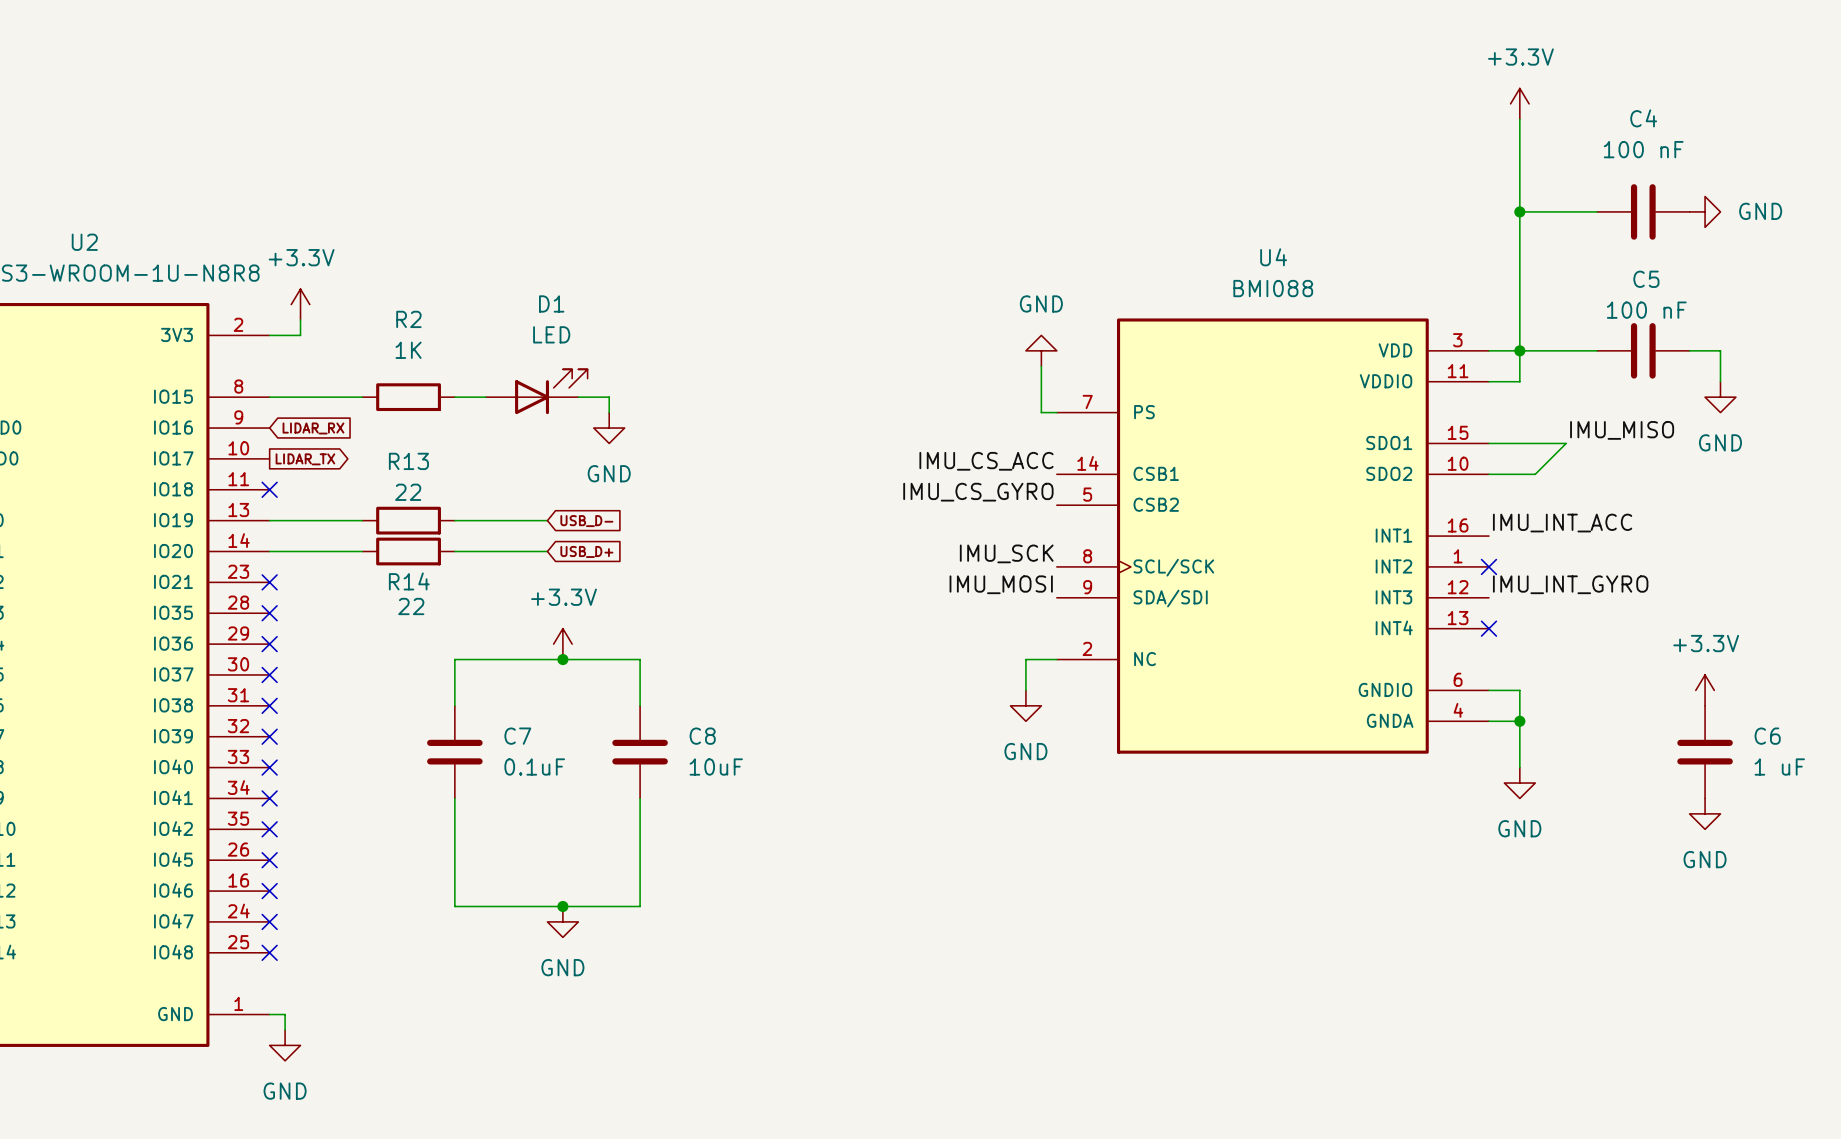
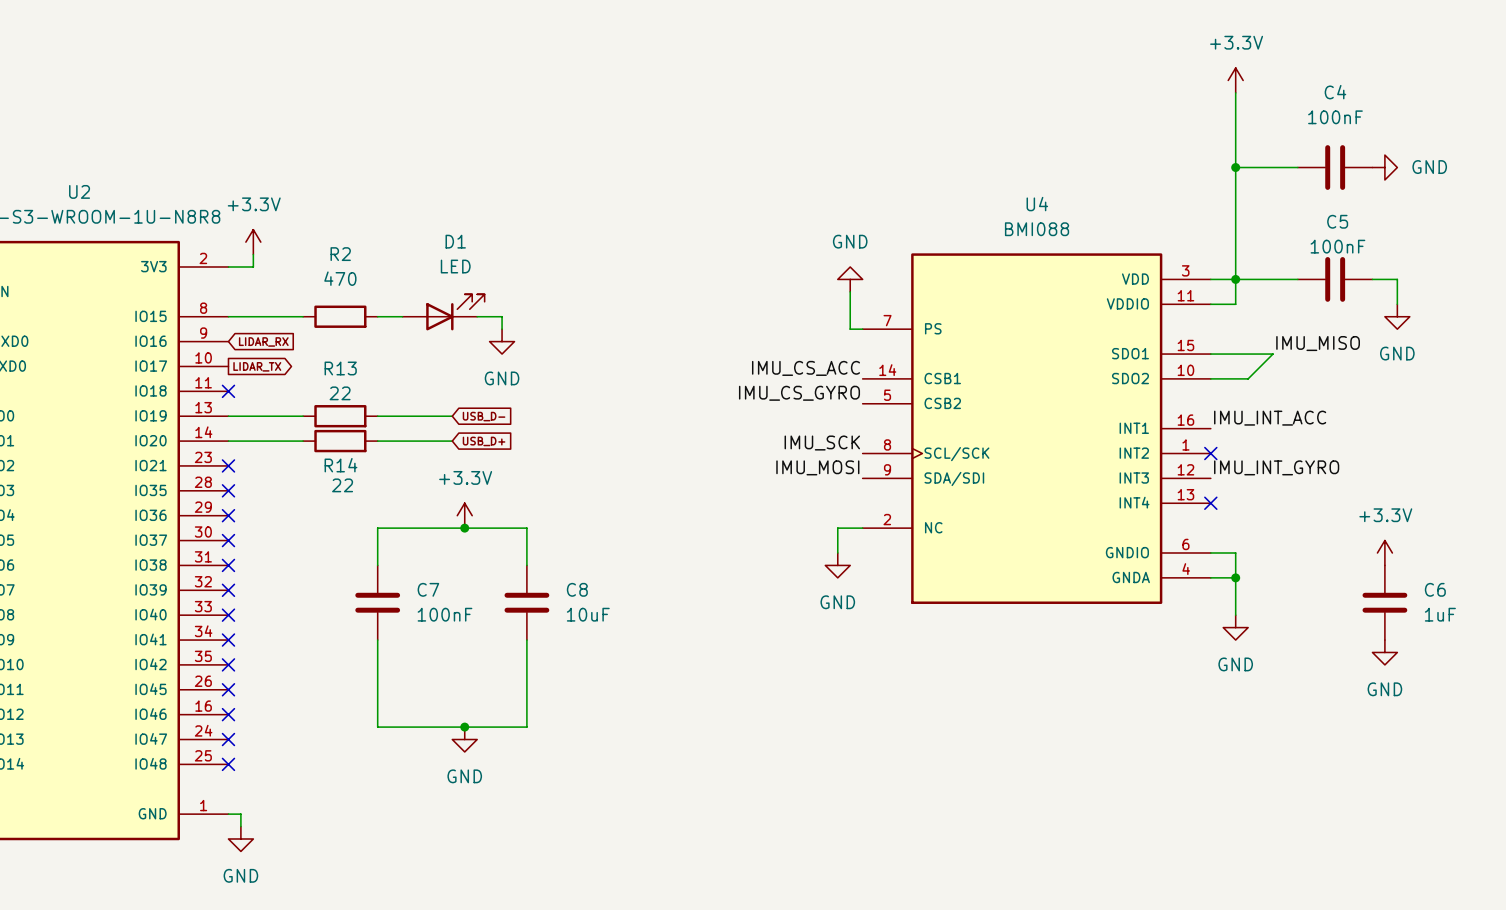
C4 value: 100 nF (1643, 149) -> 100nF (1335, 117)
C5 value: 100 nF (1646, 310) -> 100nF (1337, 246)
R2 value: 1K (408, 350) -> 470 (340, 278)
C7 value: 0.1uF (534, 767) -> 100nF (444, 614)
C6 value: 1 uF (1779, 767) -> 1uF (1440, 614)

